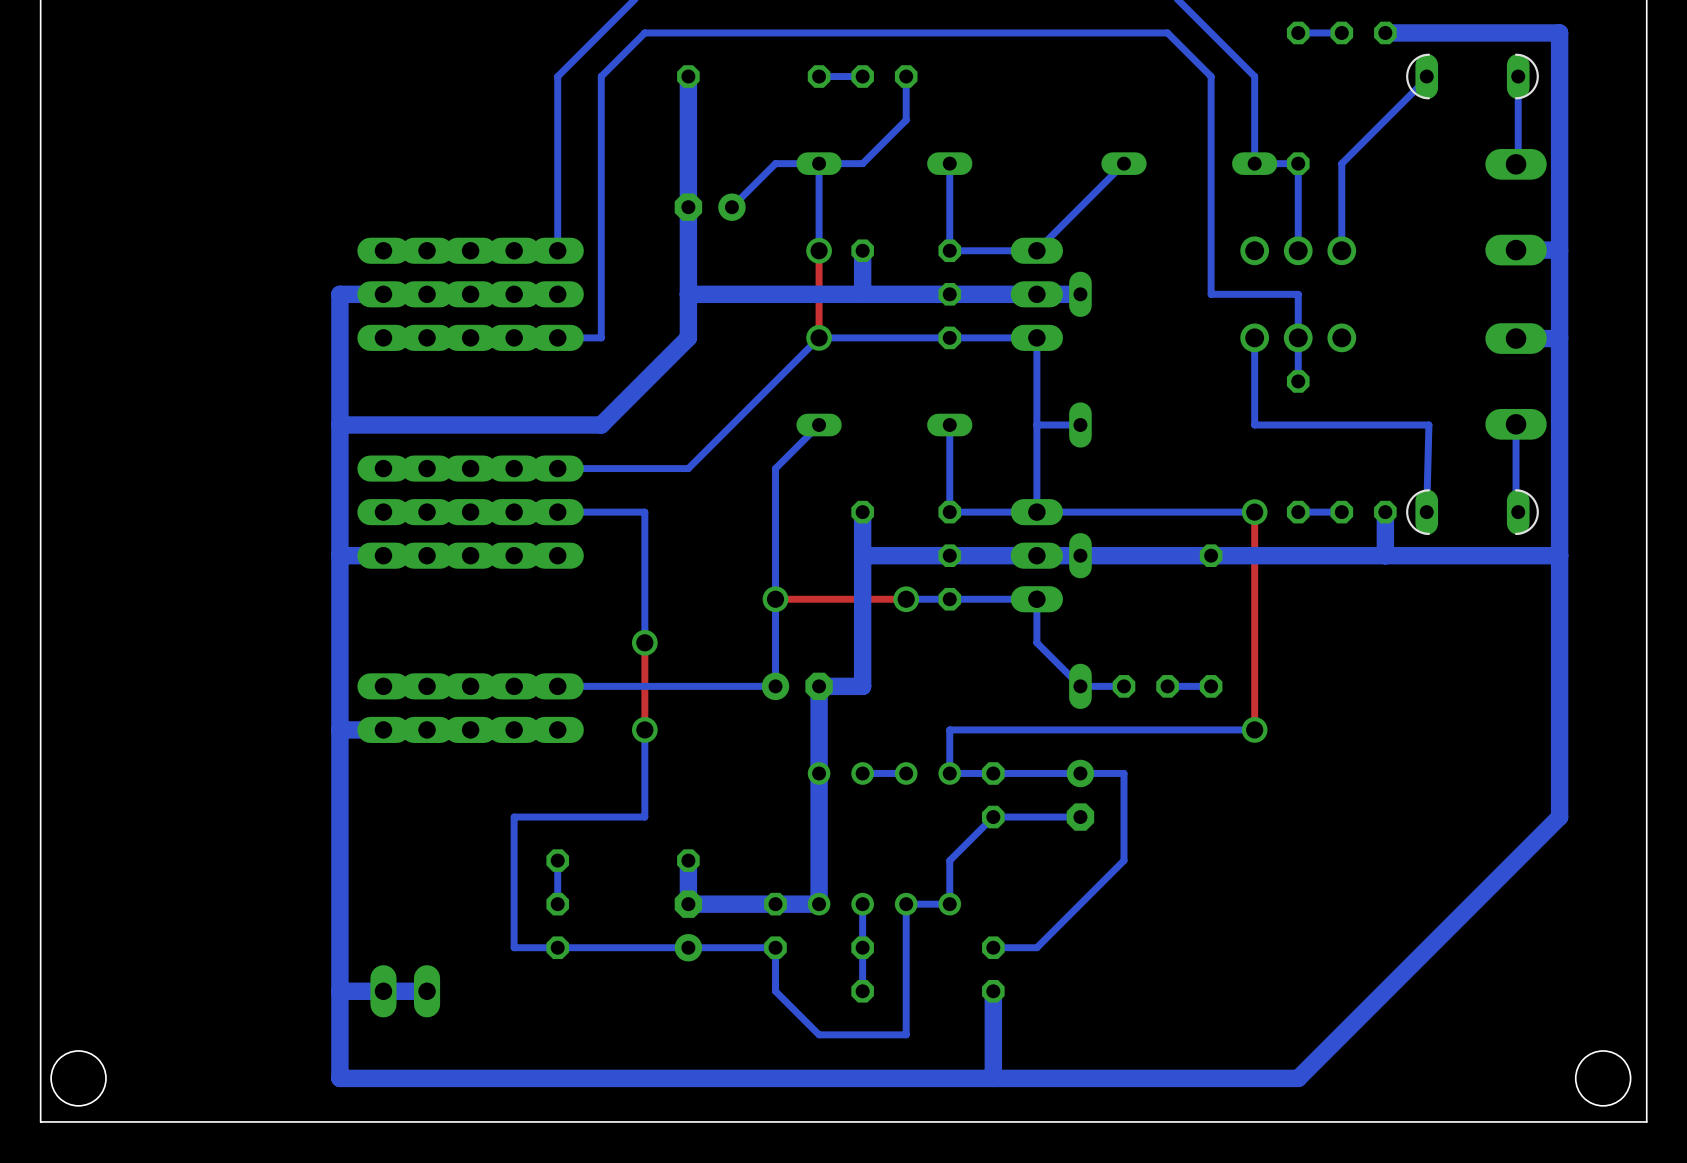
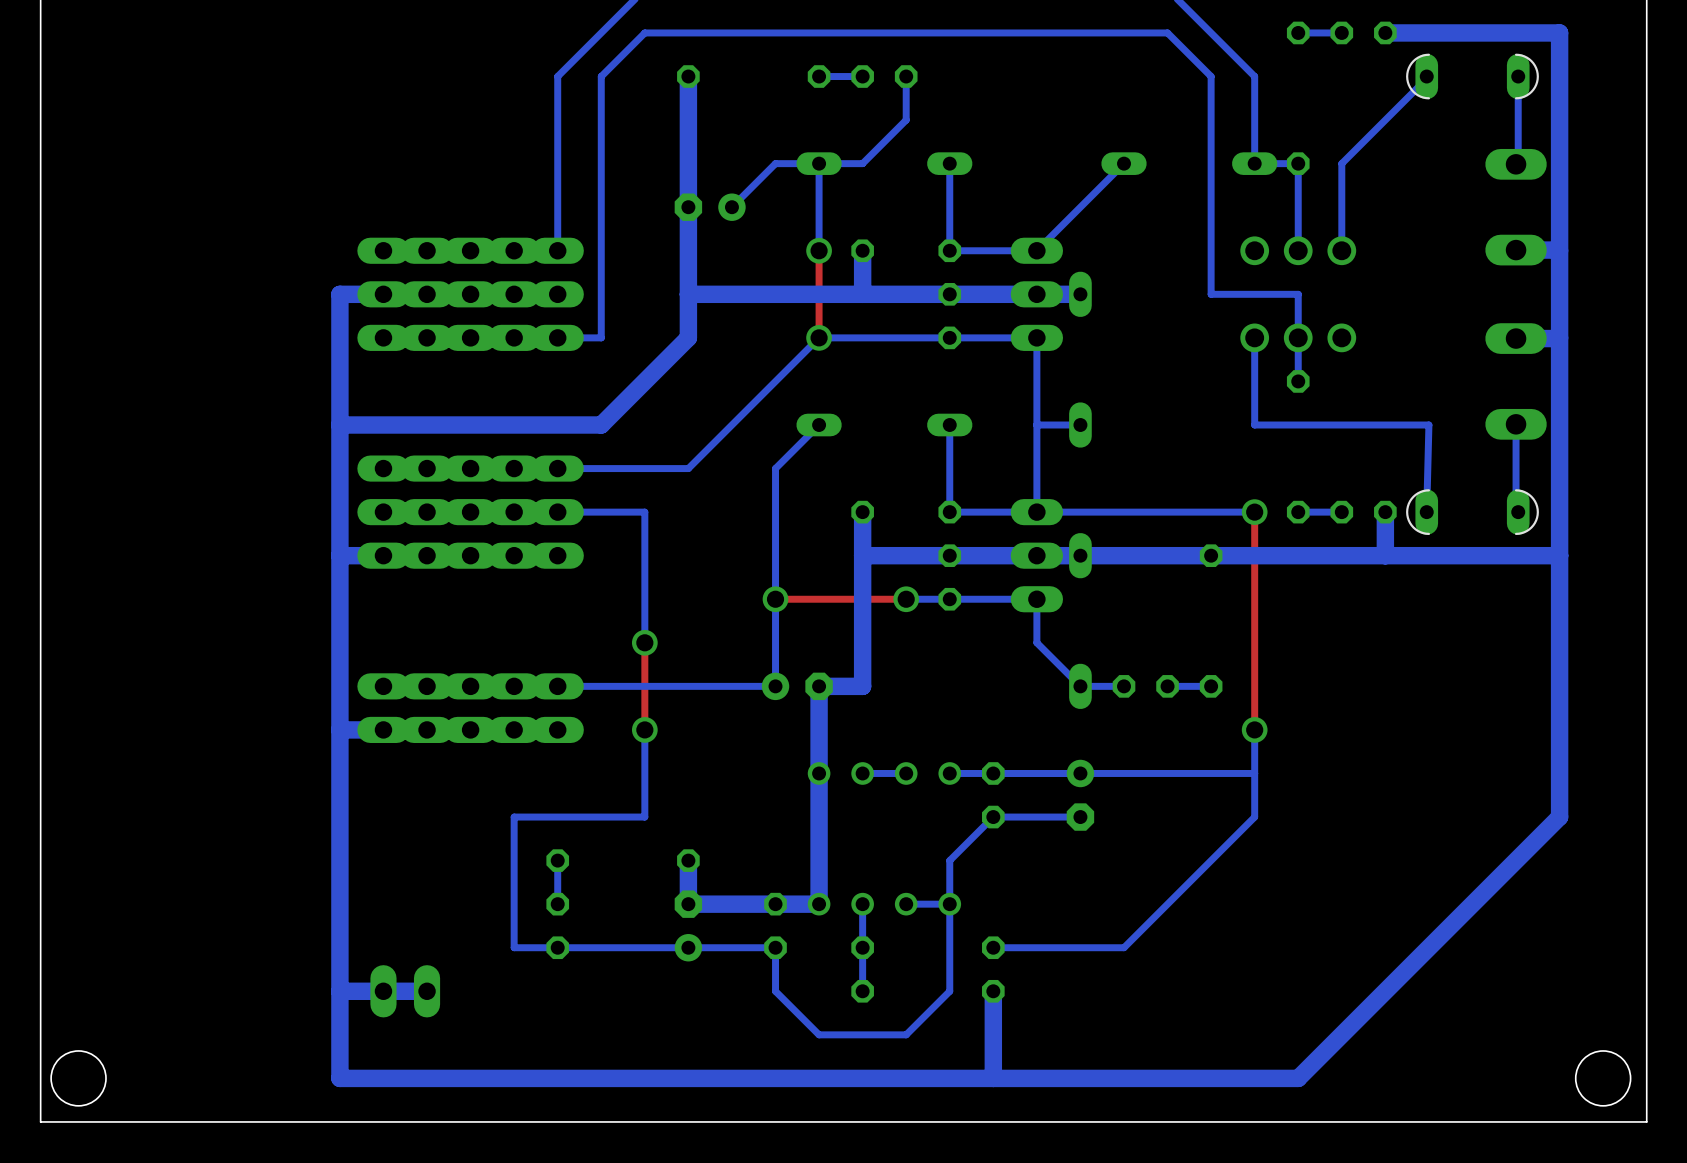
bottom track: (1254, 729) (949, 729) (949, 773) -> none
bottom track: (1124, 773) (1124, 860) (1036, 947) -> (1254, 729) (1254, 817) (1124, 947) (1036, 947)
bottom track: none -> (1254, 773) (1124, 773)
bottom track: (906, 904) (906, 1034) -> (949, 904) (949, 991) (906, 1034)

